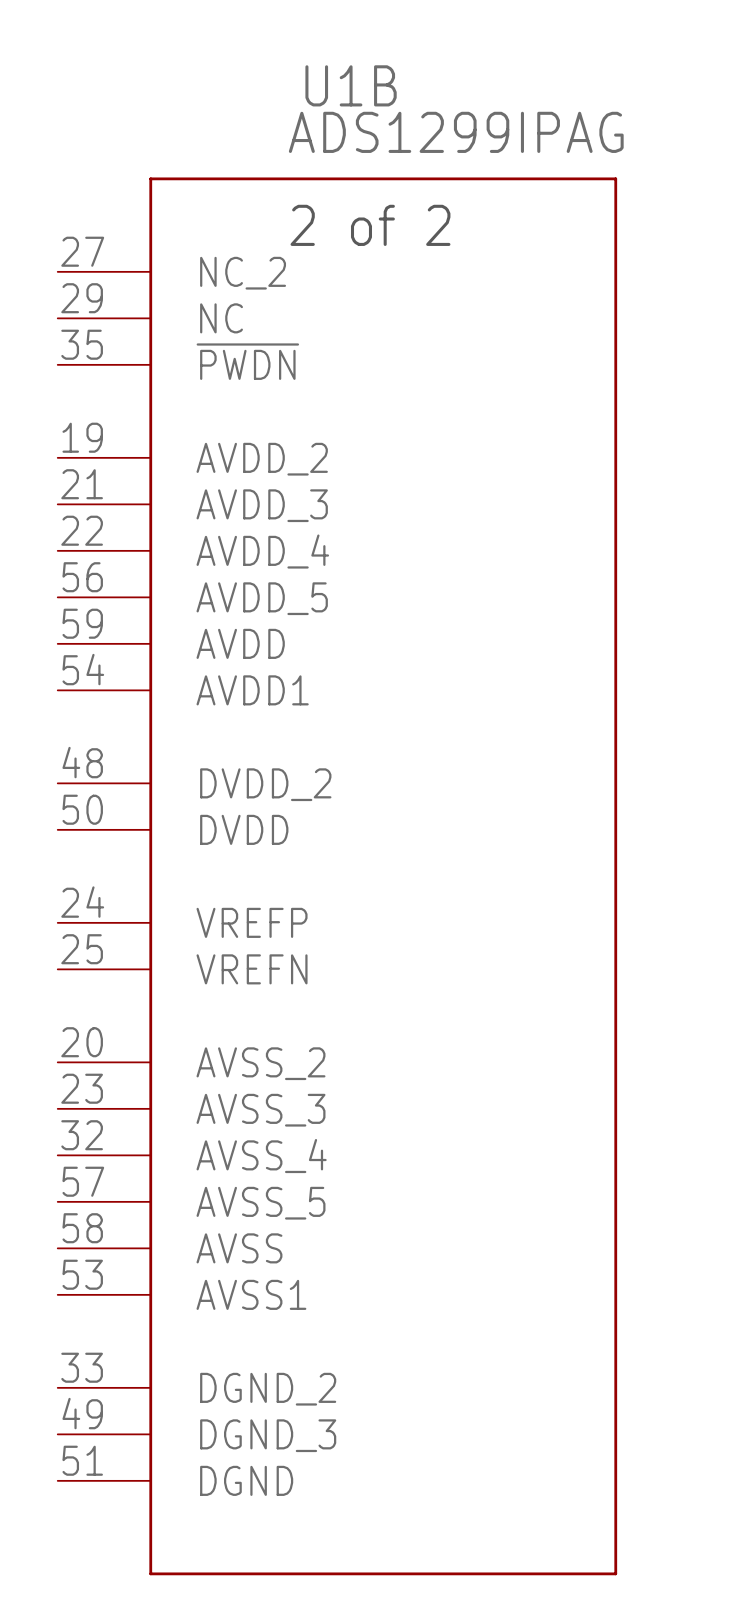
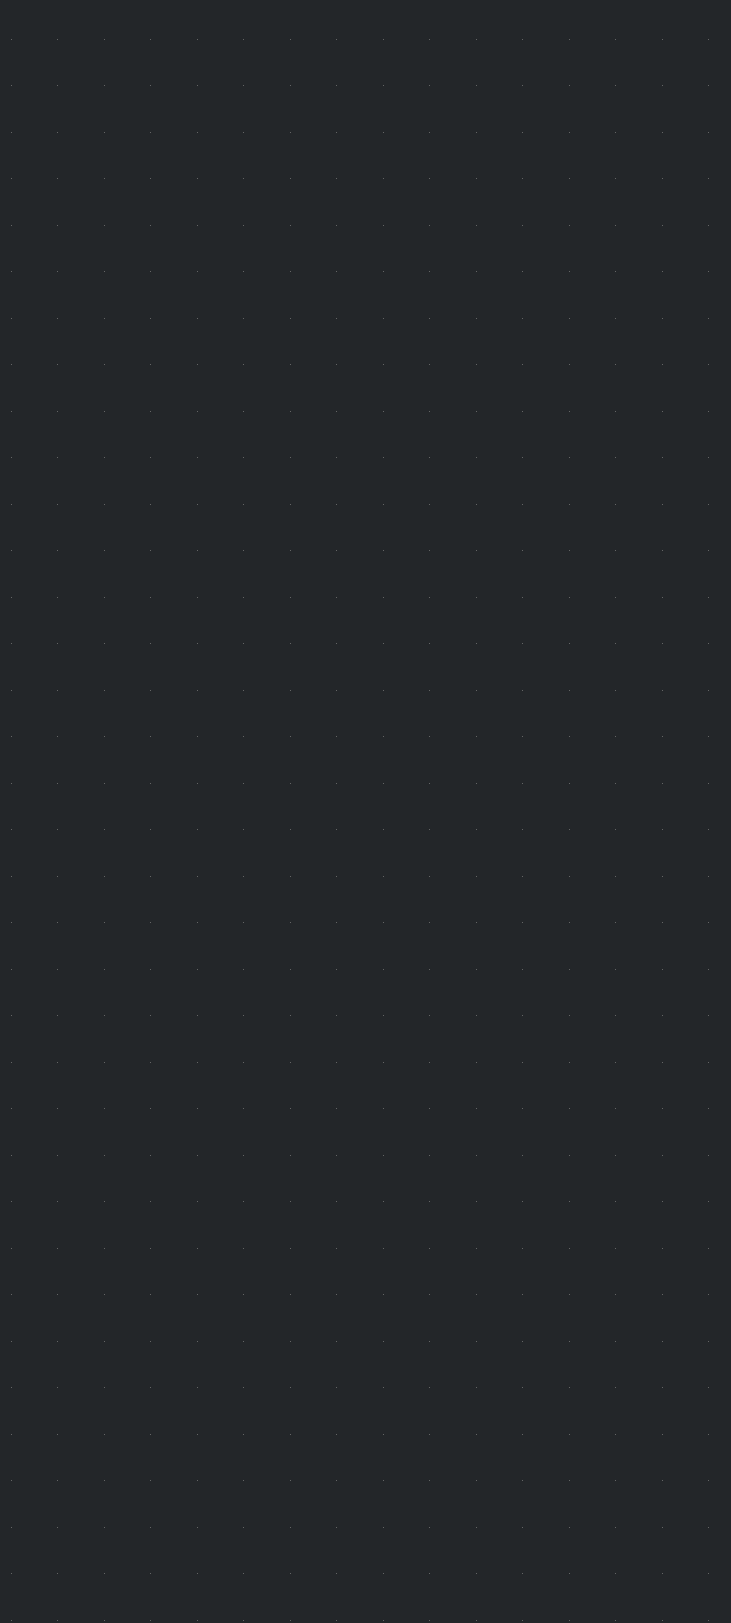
U1B: ADS1299IPAG (337, 876) -> none

